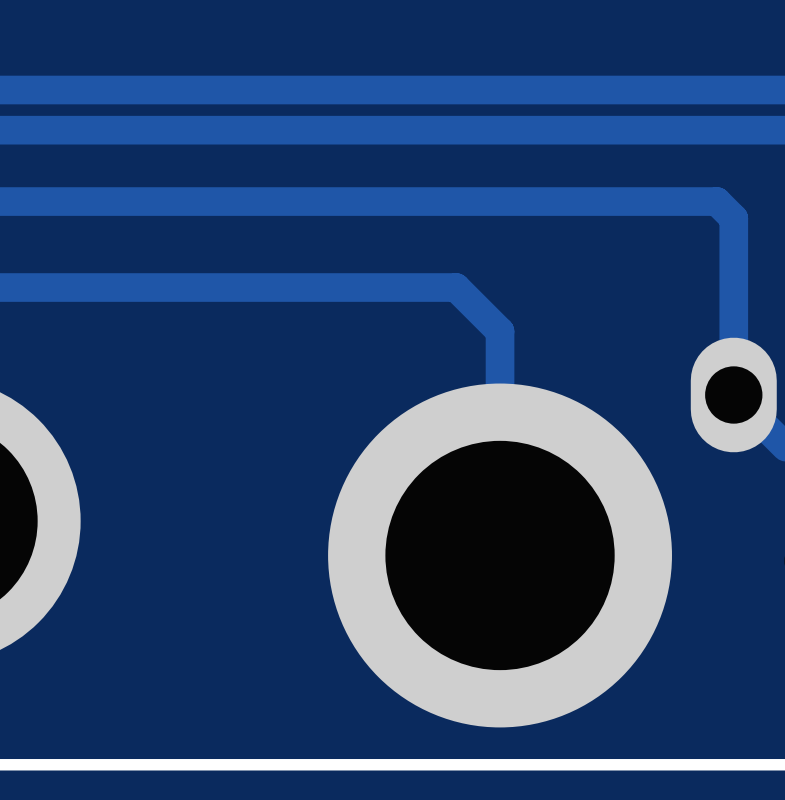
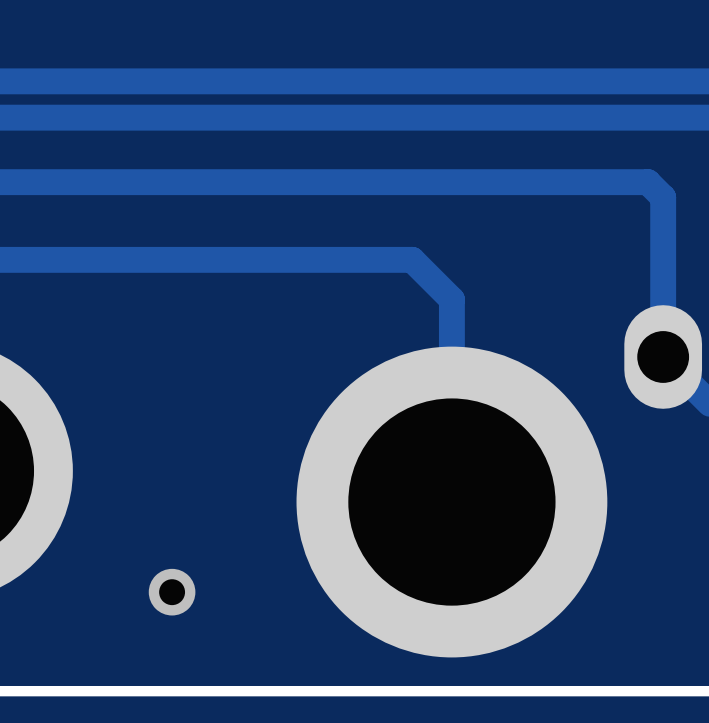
via: none -> (172, 592)

